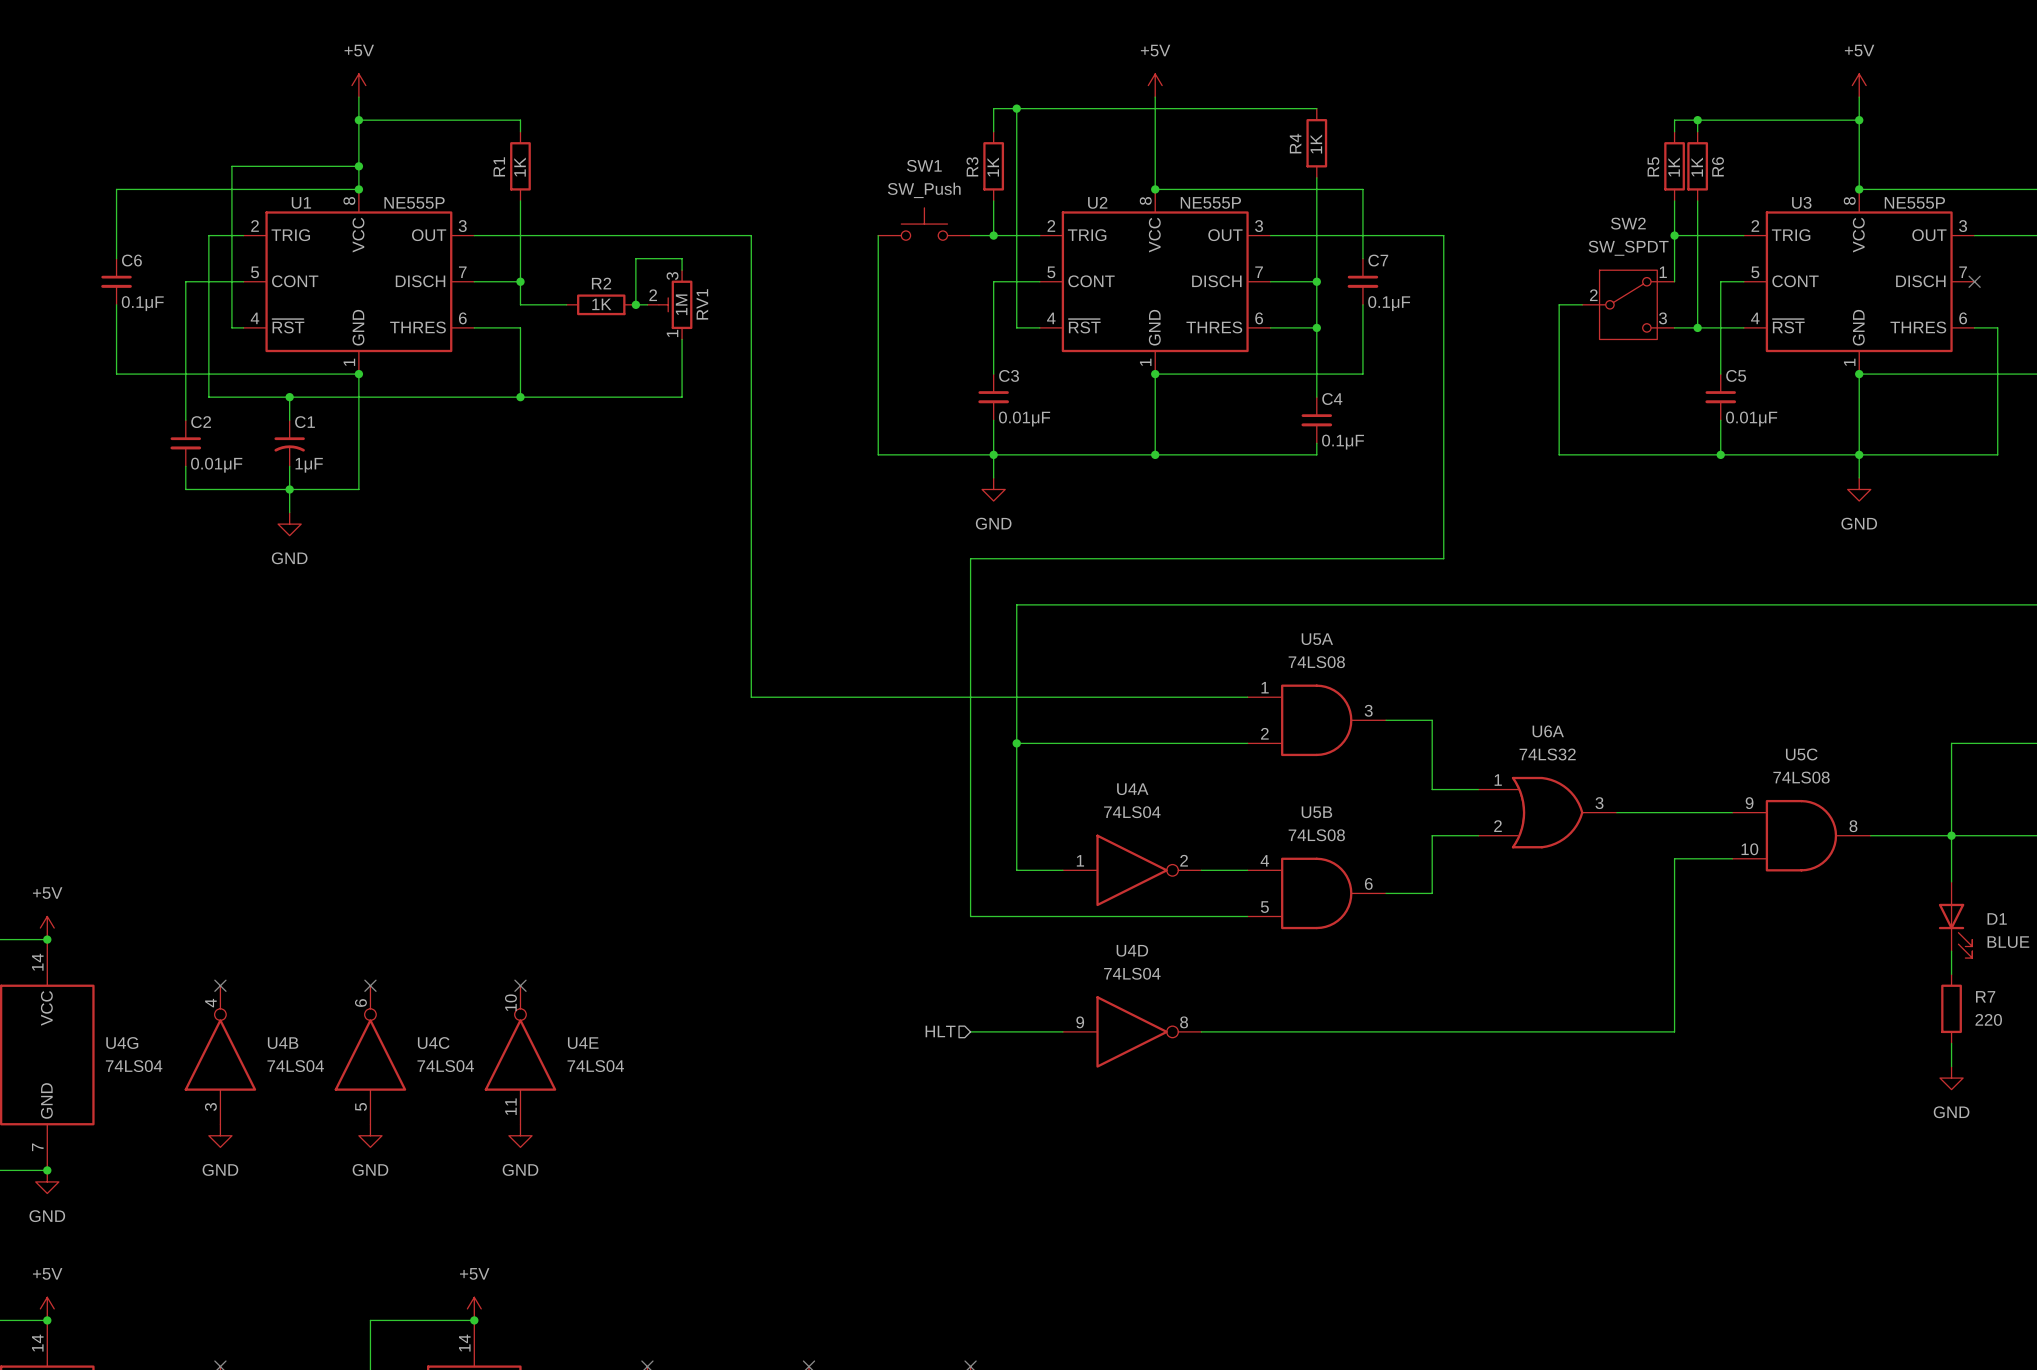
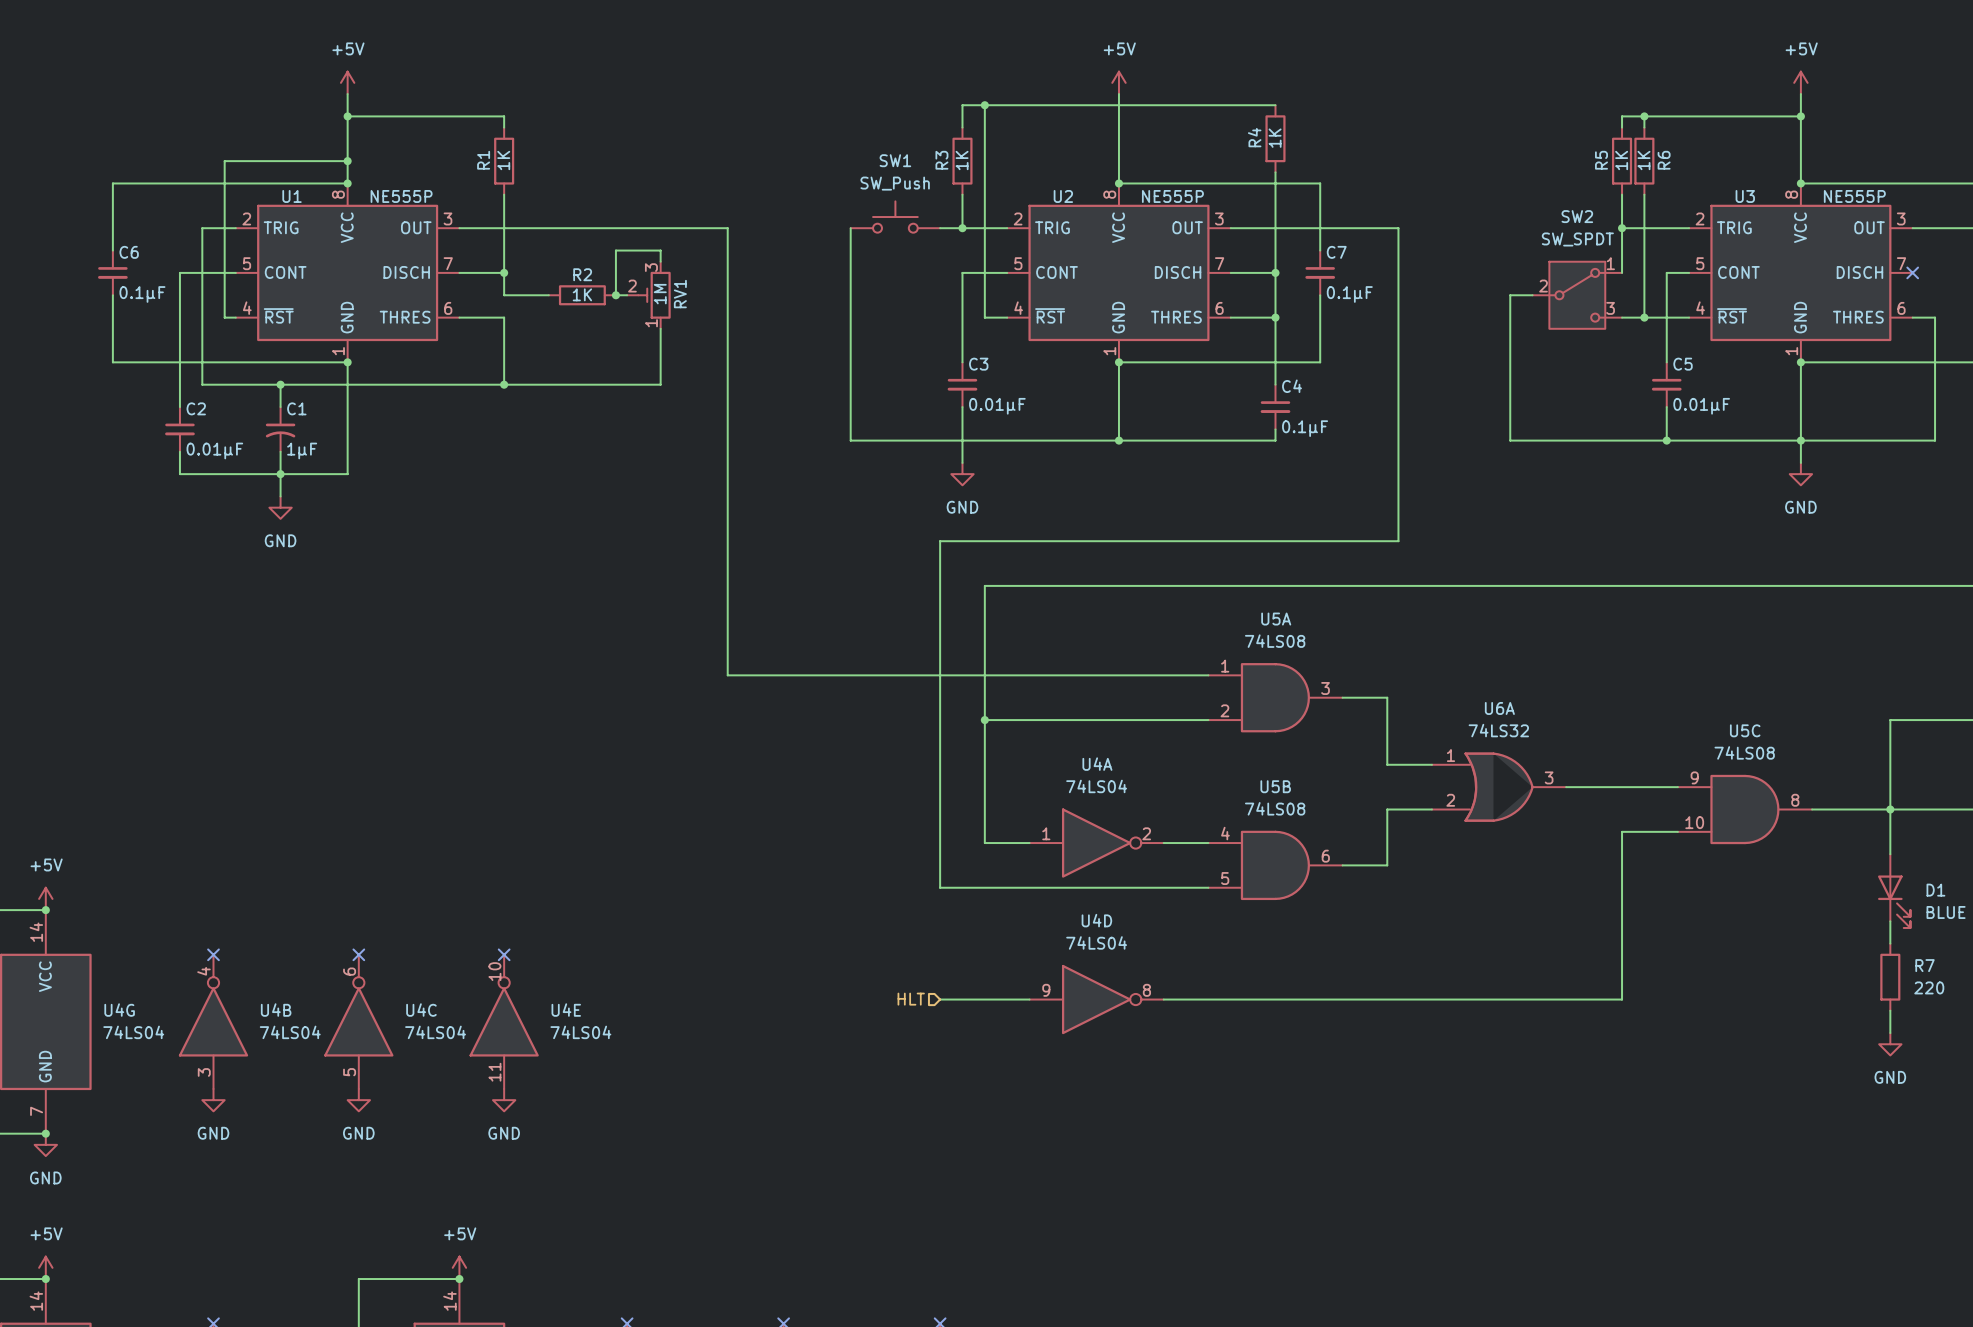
junction: (993, 454) -> none

